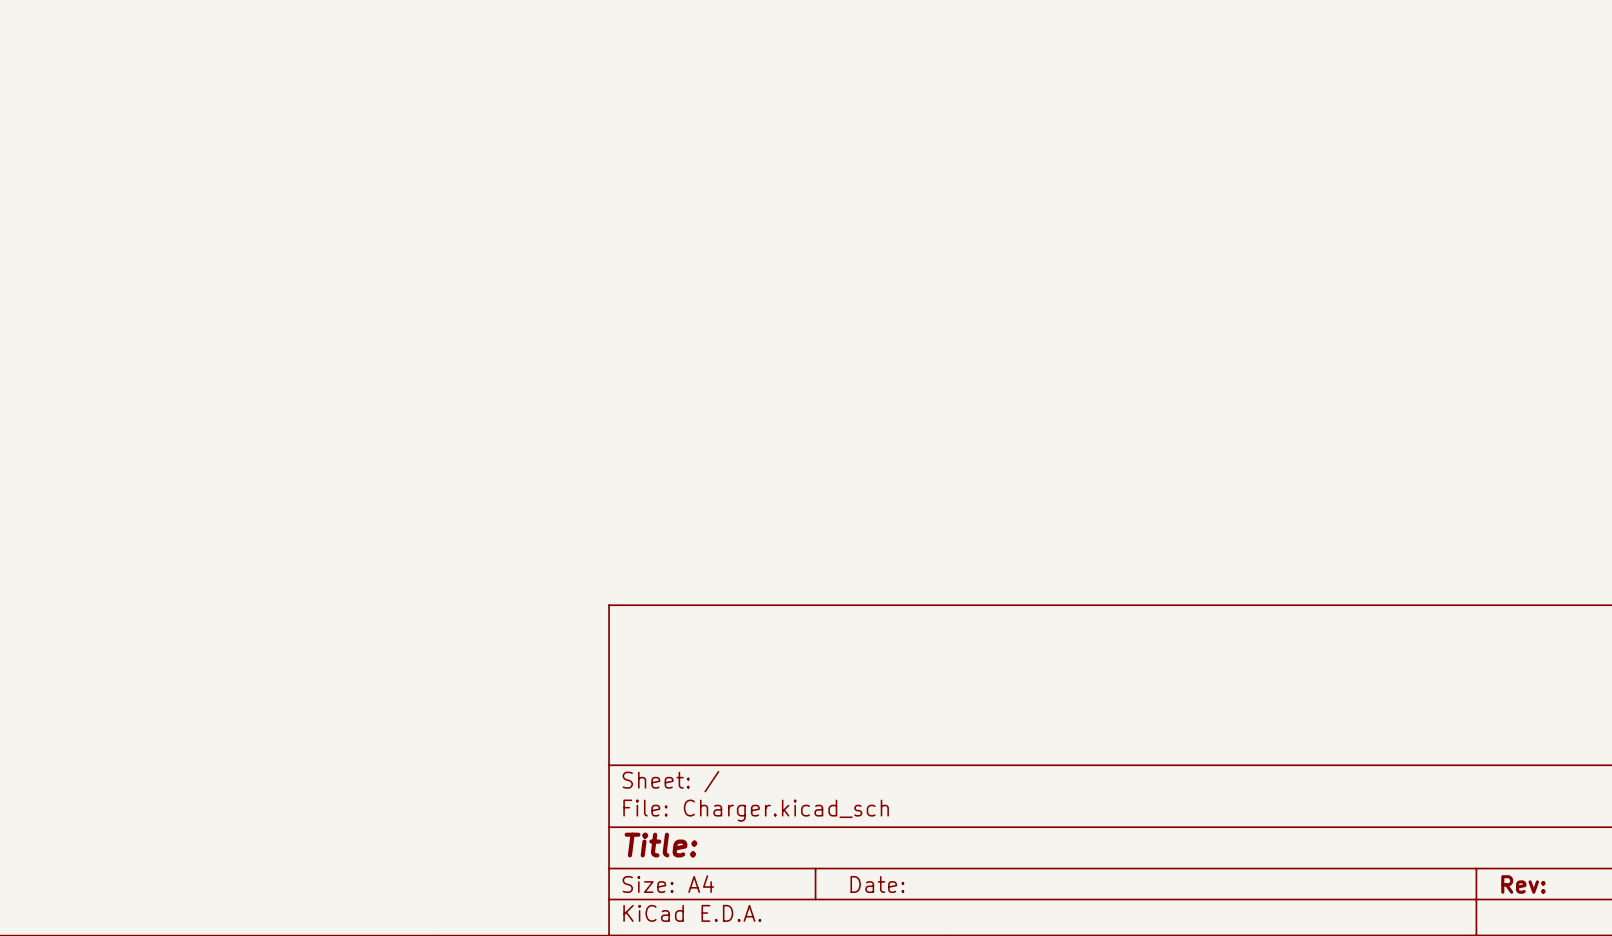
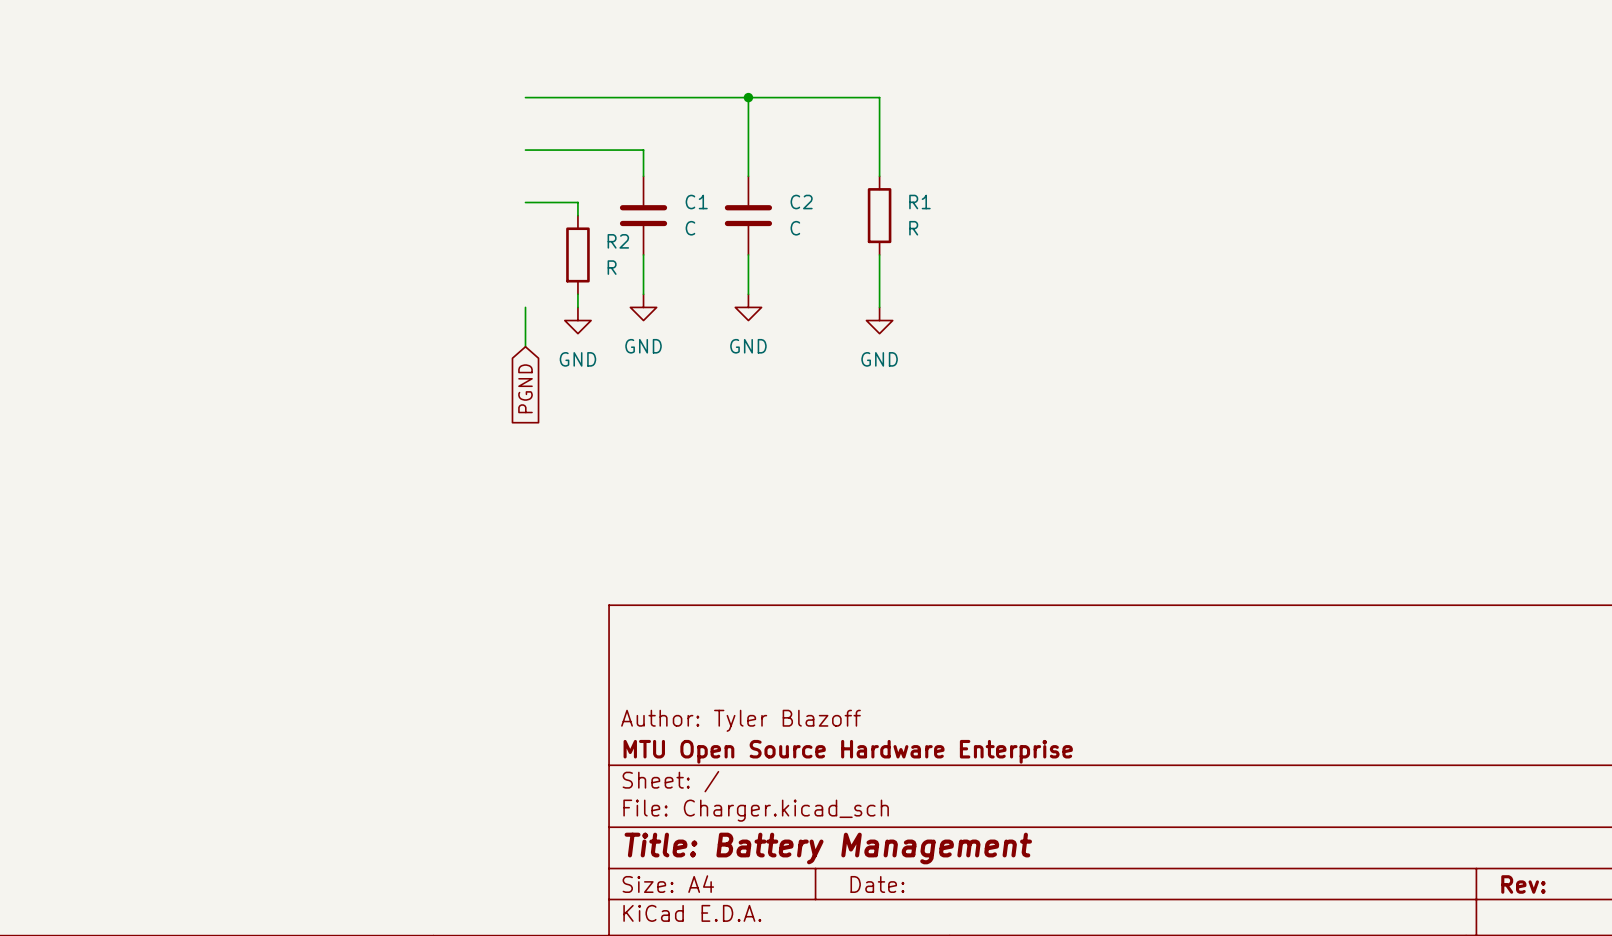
wire: none -> (525, 97) (879, 97) (879, 176)
wire: none -> (748, 97) (748, 176)
junction: none -> (748, 97)
wire: none -> (525, 150) (643, 150) (643, 176)
wire: none -> (525, 202) (577, 202) (577, 215)
C1: none -> C (643, 215)
C2: none -> C (748, 215)
R1: none -> R (879, 215)
R2: none -> R (577, 254)
wire: none -> (643, 254) (643, 294)
wire: none -> (748, 254) (748, 294)
wire: none -> (879, 254) (879, 307)
wire: none -> (577, 294) (577, 307)
wire: none -> (525, 307) (525, 346)
power symbol: none -> GND (643, 307)
power symbol: none -> GND (748, 307)
power symbol: none -> GND (577, 320)
power symbol: none -> GND (879, 320)
global label: none -> PGND (525, 388)
title block: none -> Author: Tyler Blazoff (740, 720)
title block: none -> MTU Open Source Hardware Enterprise (848, 751)
title block: Title: (660, 845) -> Title: Battery Management (828, 848)

